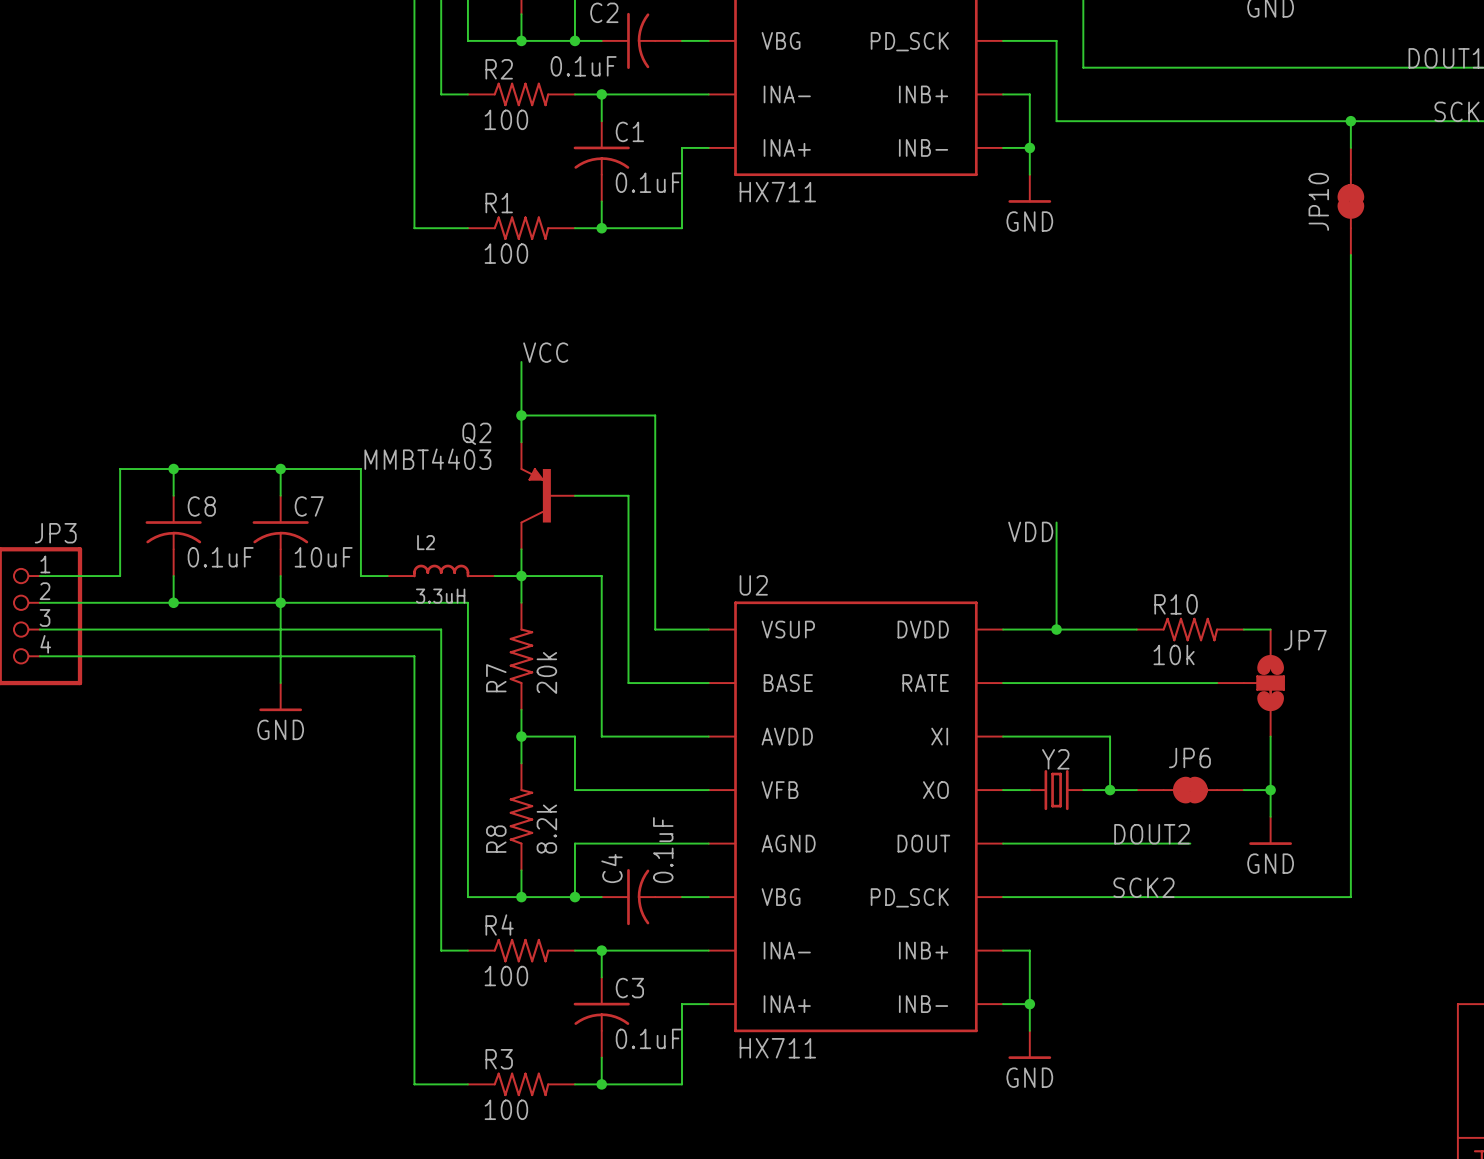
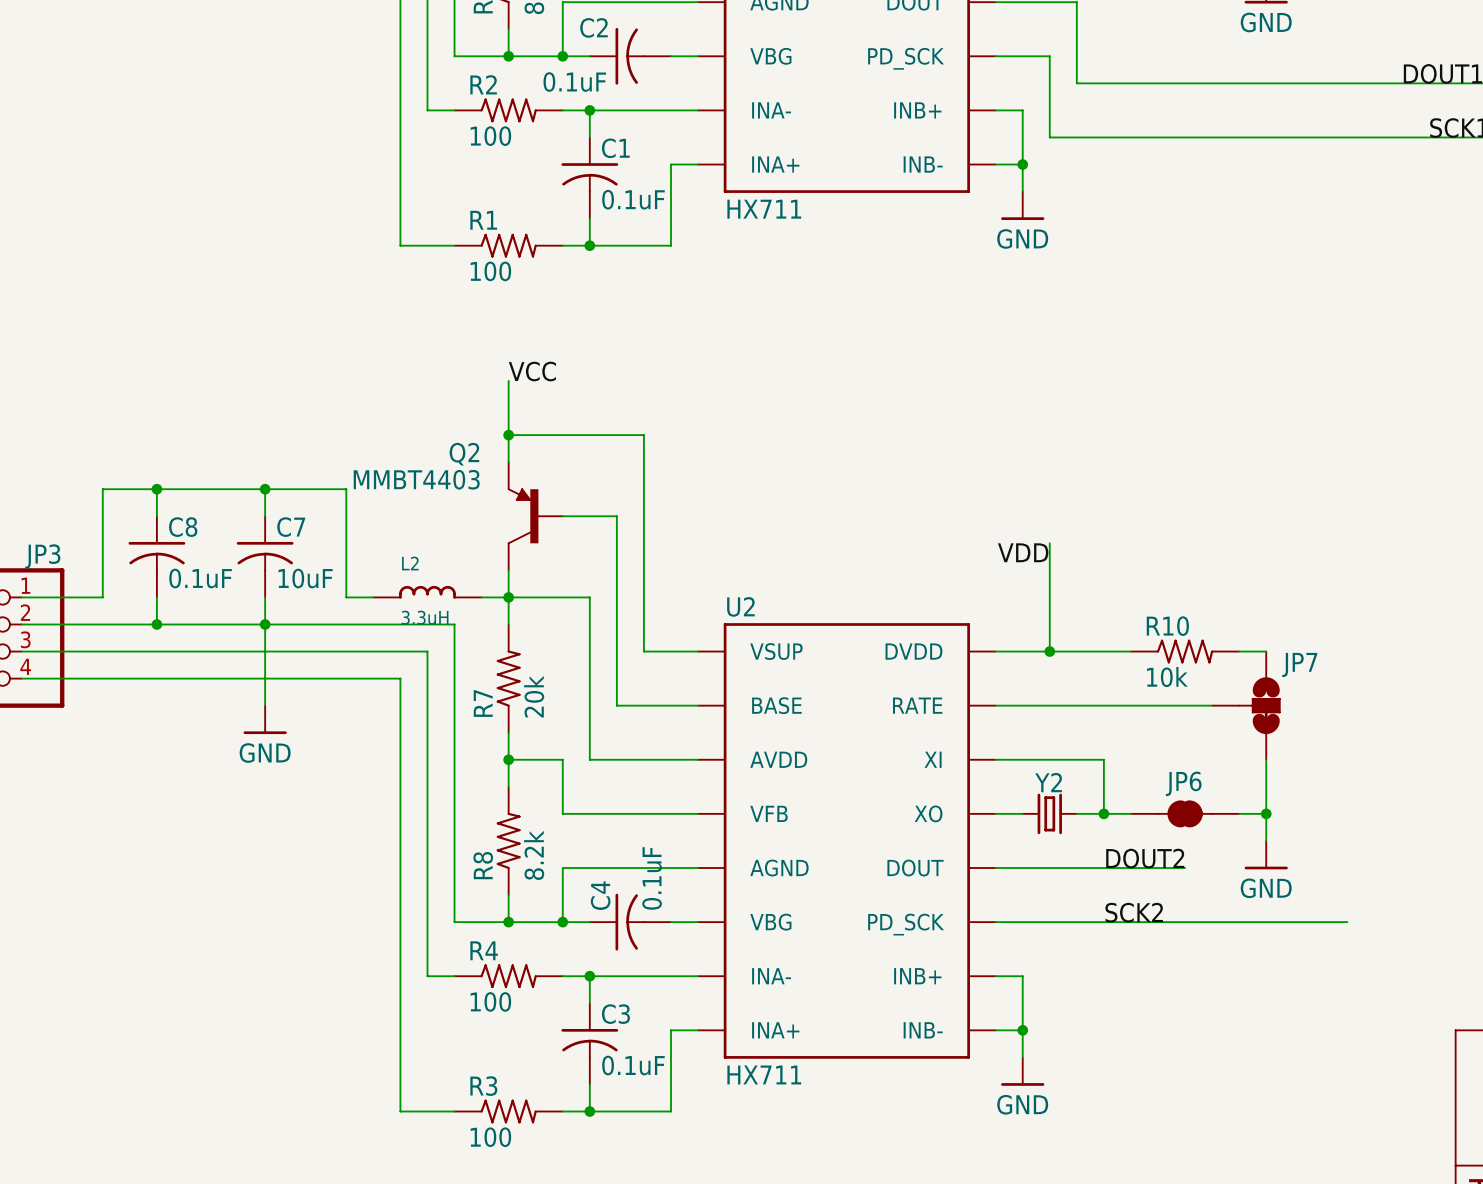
wire: (1350, 121) (1350, 147) -> none
junction: (1350, 121) -> none
JP10: (1350, 201) -> none
wire: (1350, 254) (1350, 897) -> none

